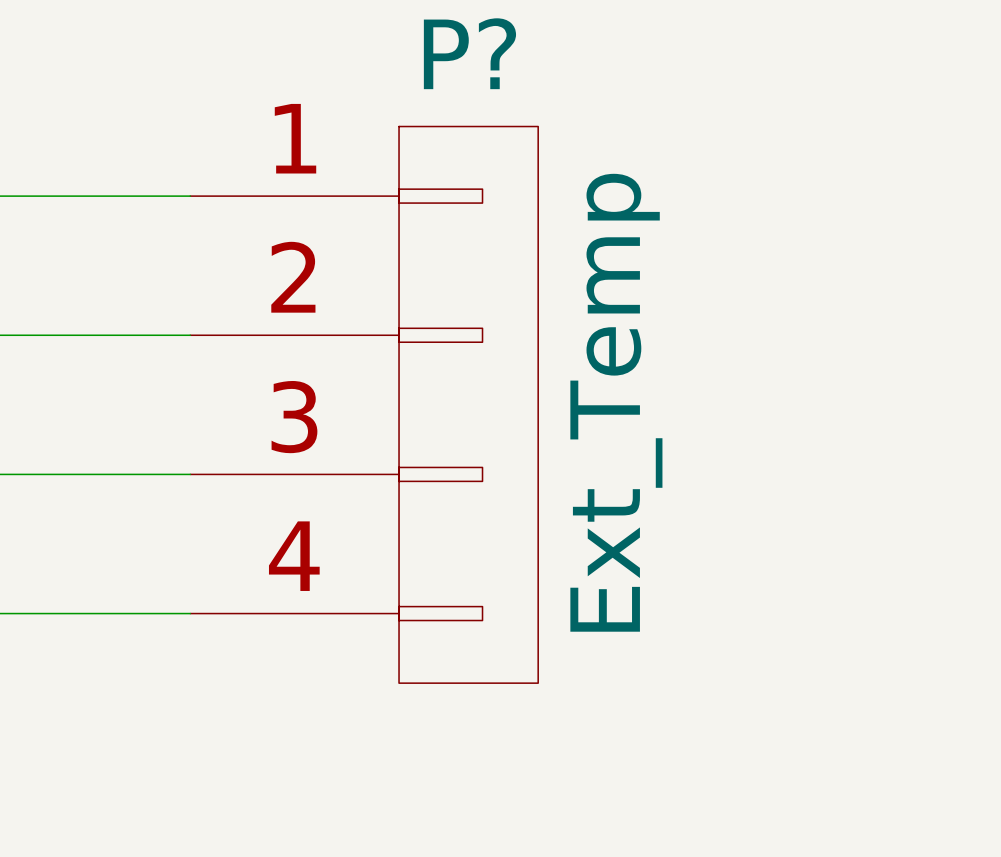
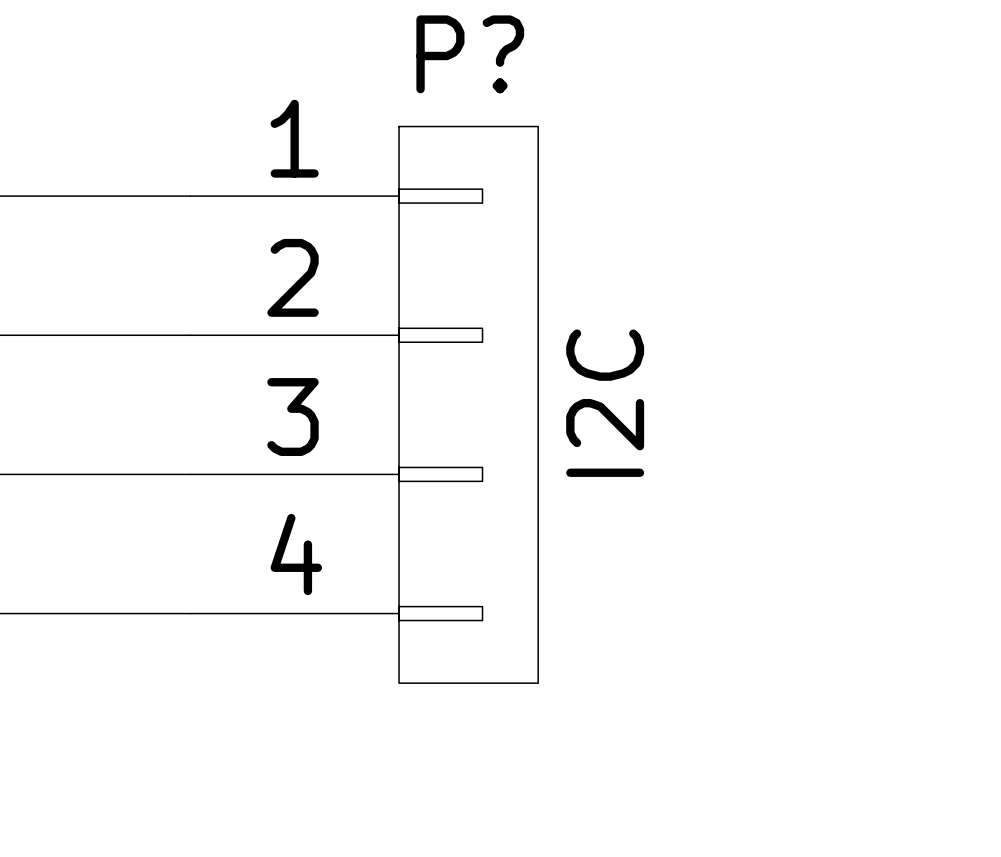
P? value: Ext_Temp (616, 402) -> I2C (605, 403)

